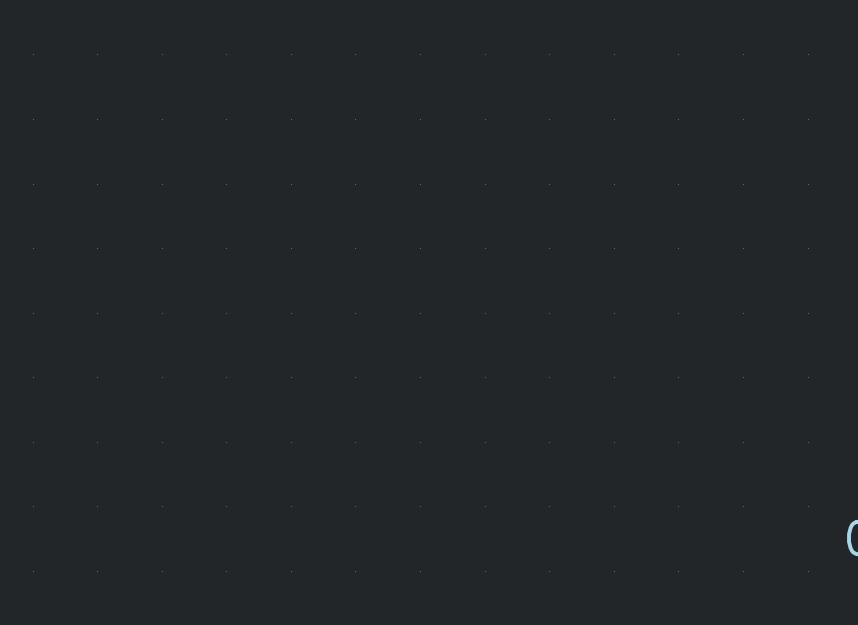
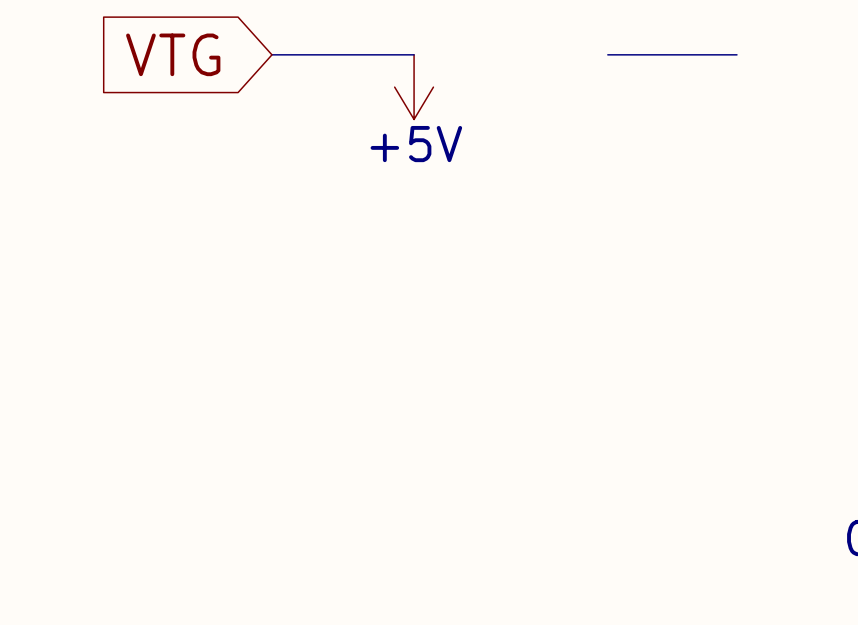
global label: none -> VTG (173, 54)
wire: none -> (271, 54) (414, 54)
wire: none -> (607, 54) (736, 54)
power symbol: none -> +5V (414, 87)

